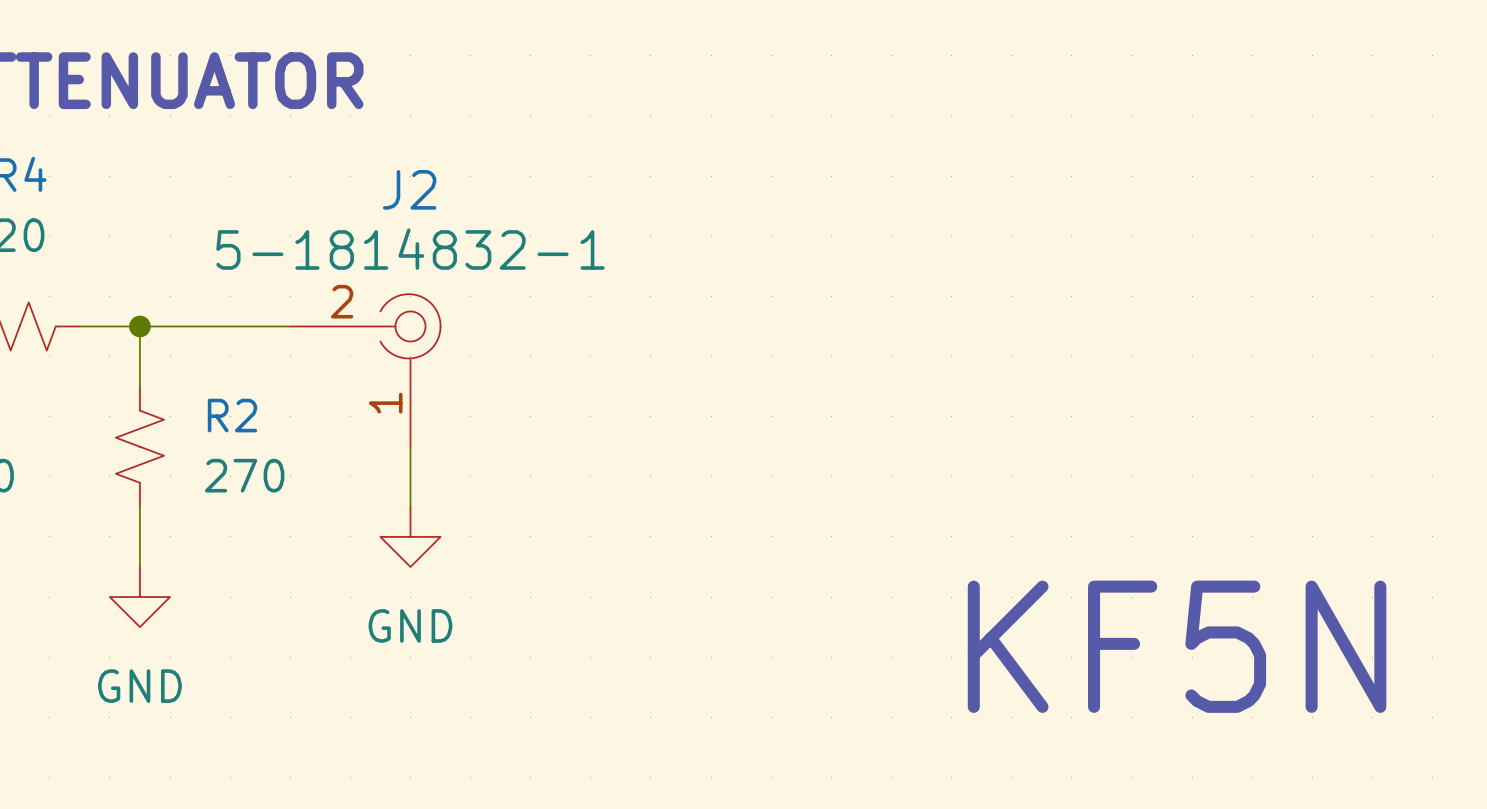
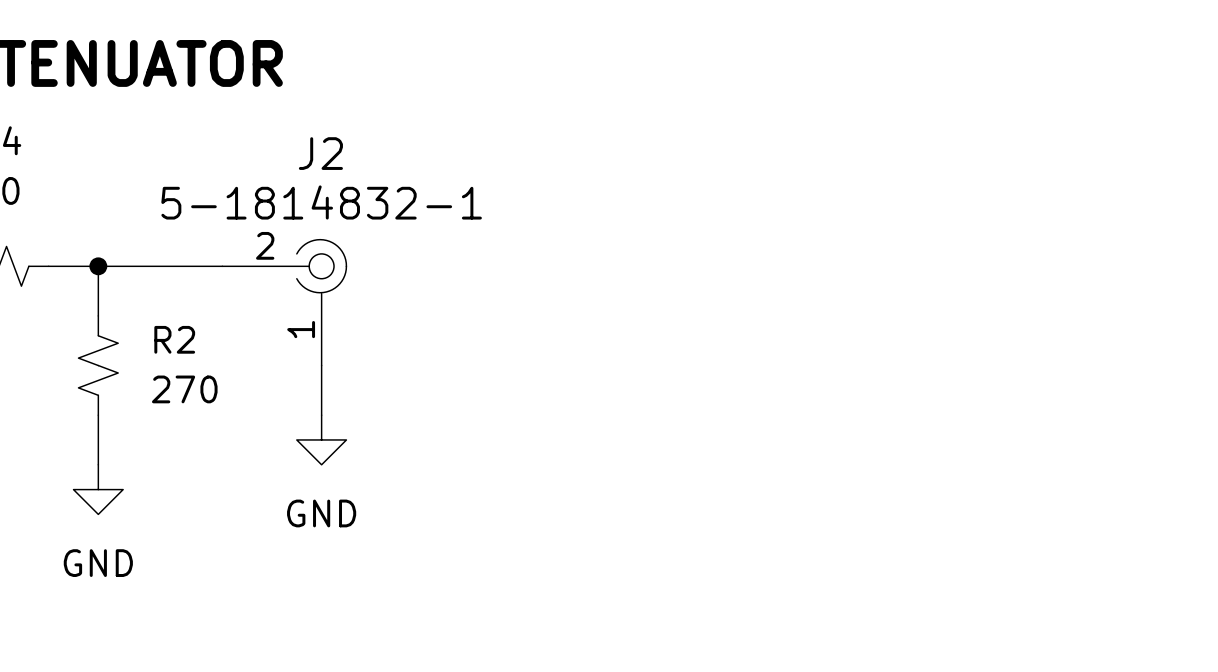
text: KF5N (1177, 646) -> none

